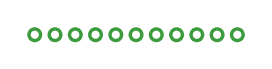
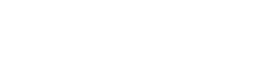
part: (136, 34) -> none

